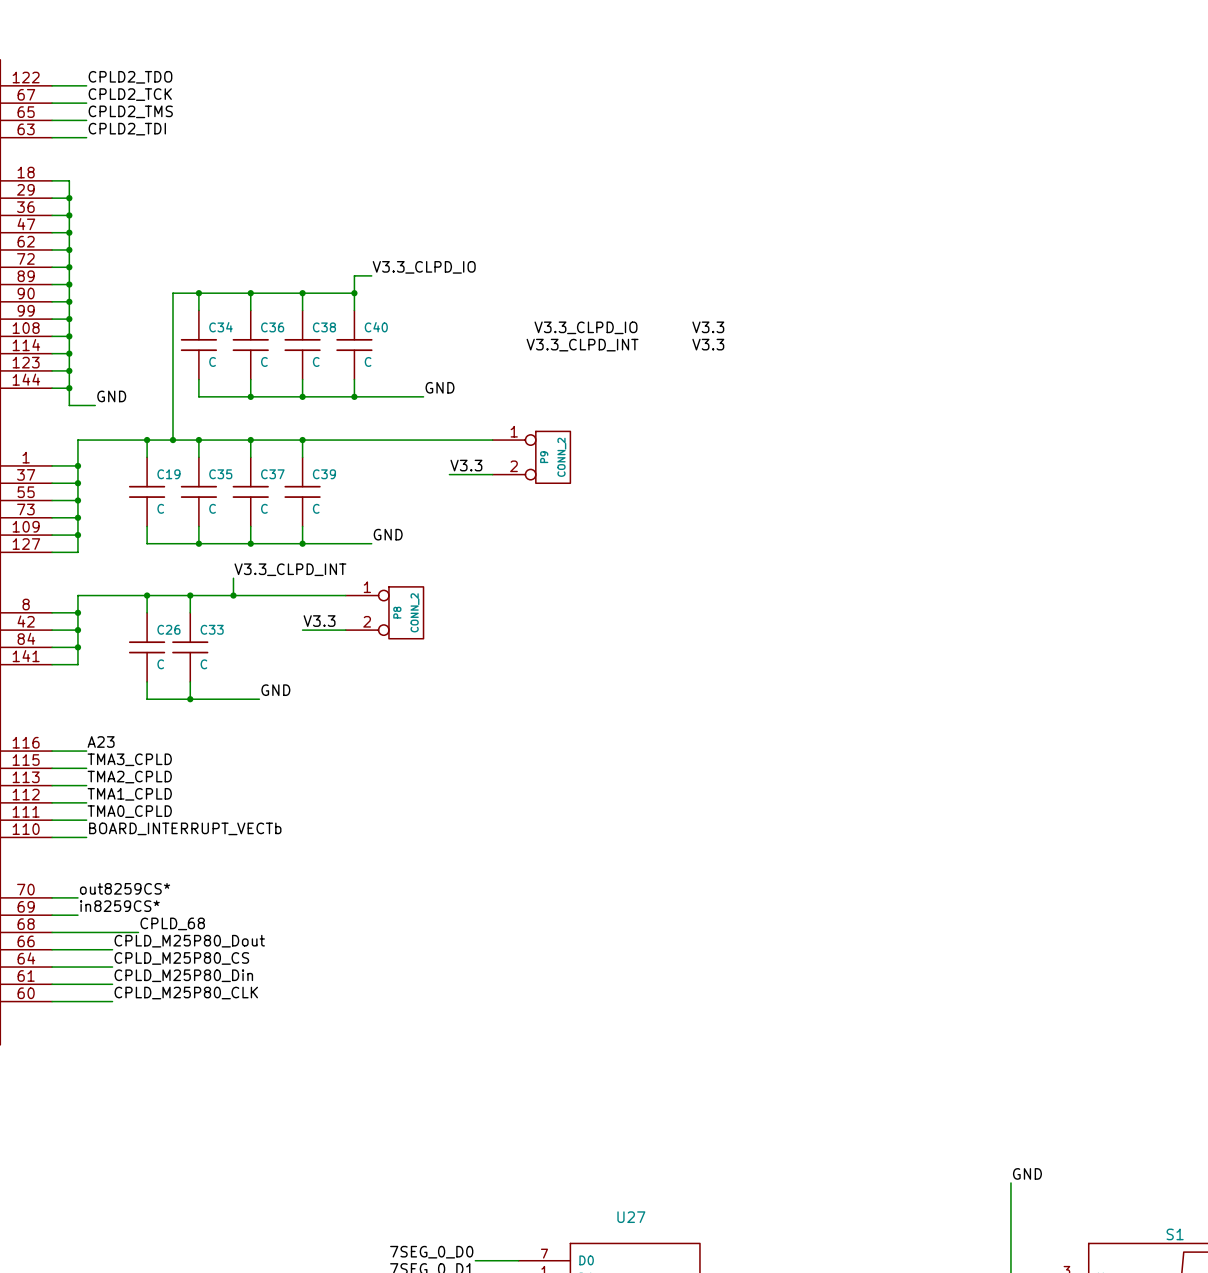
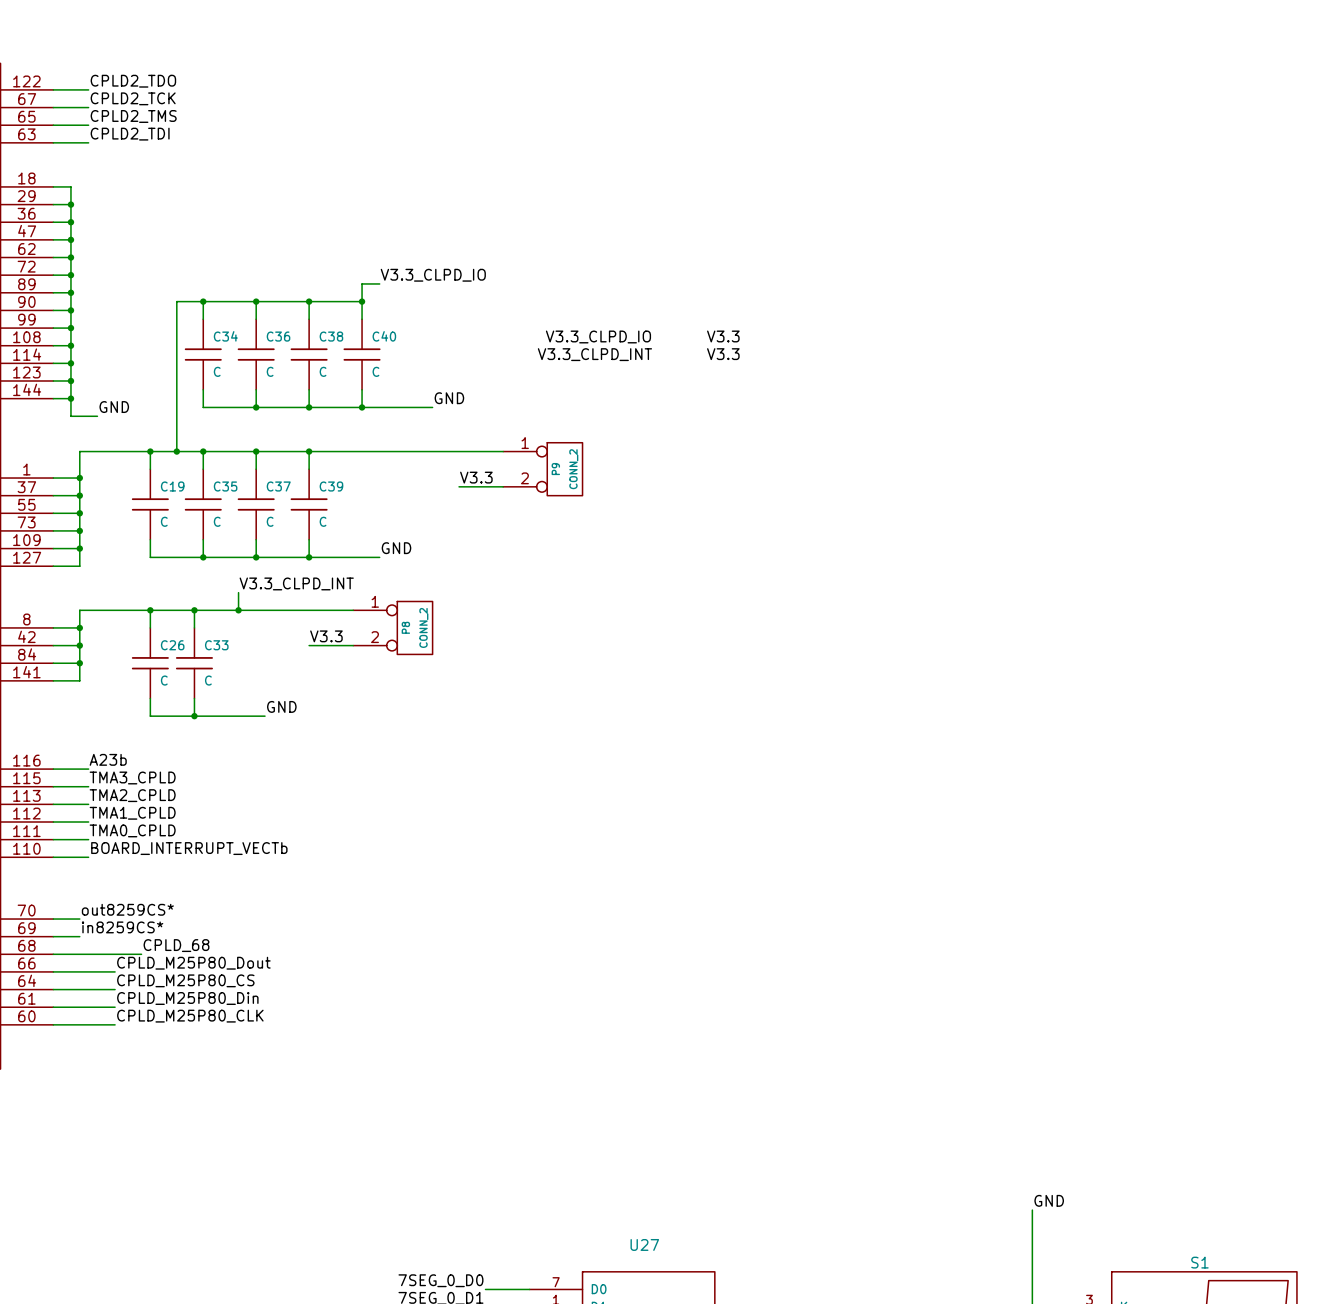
label: A23 (101, 742) -> A23b (108, 759)

